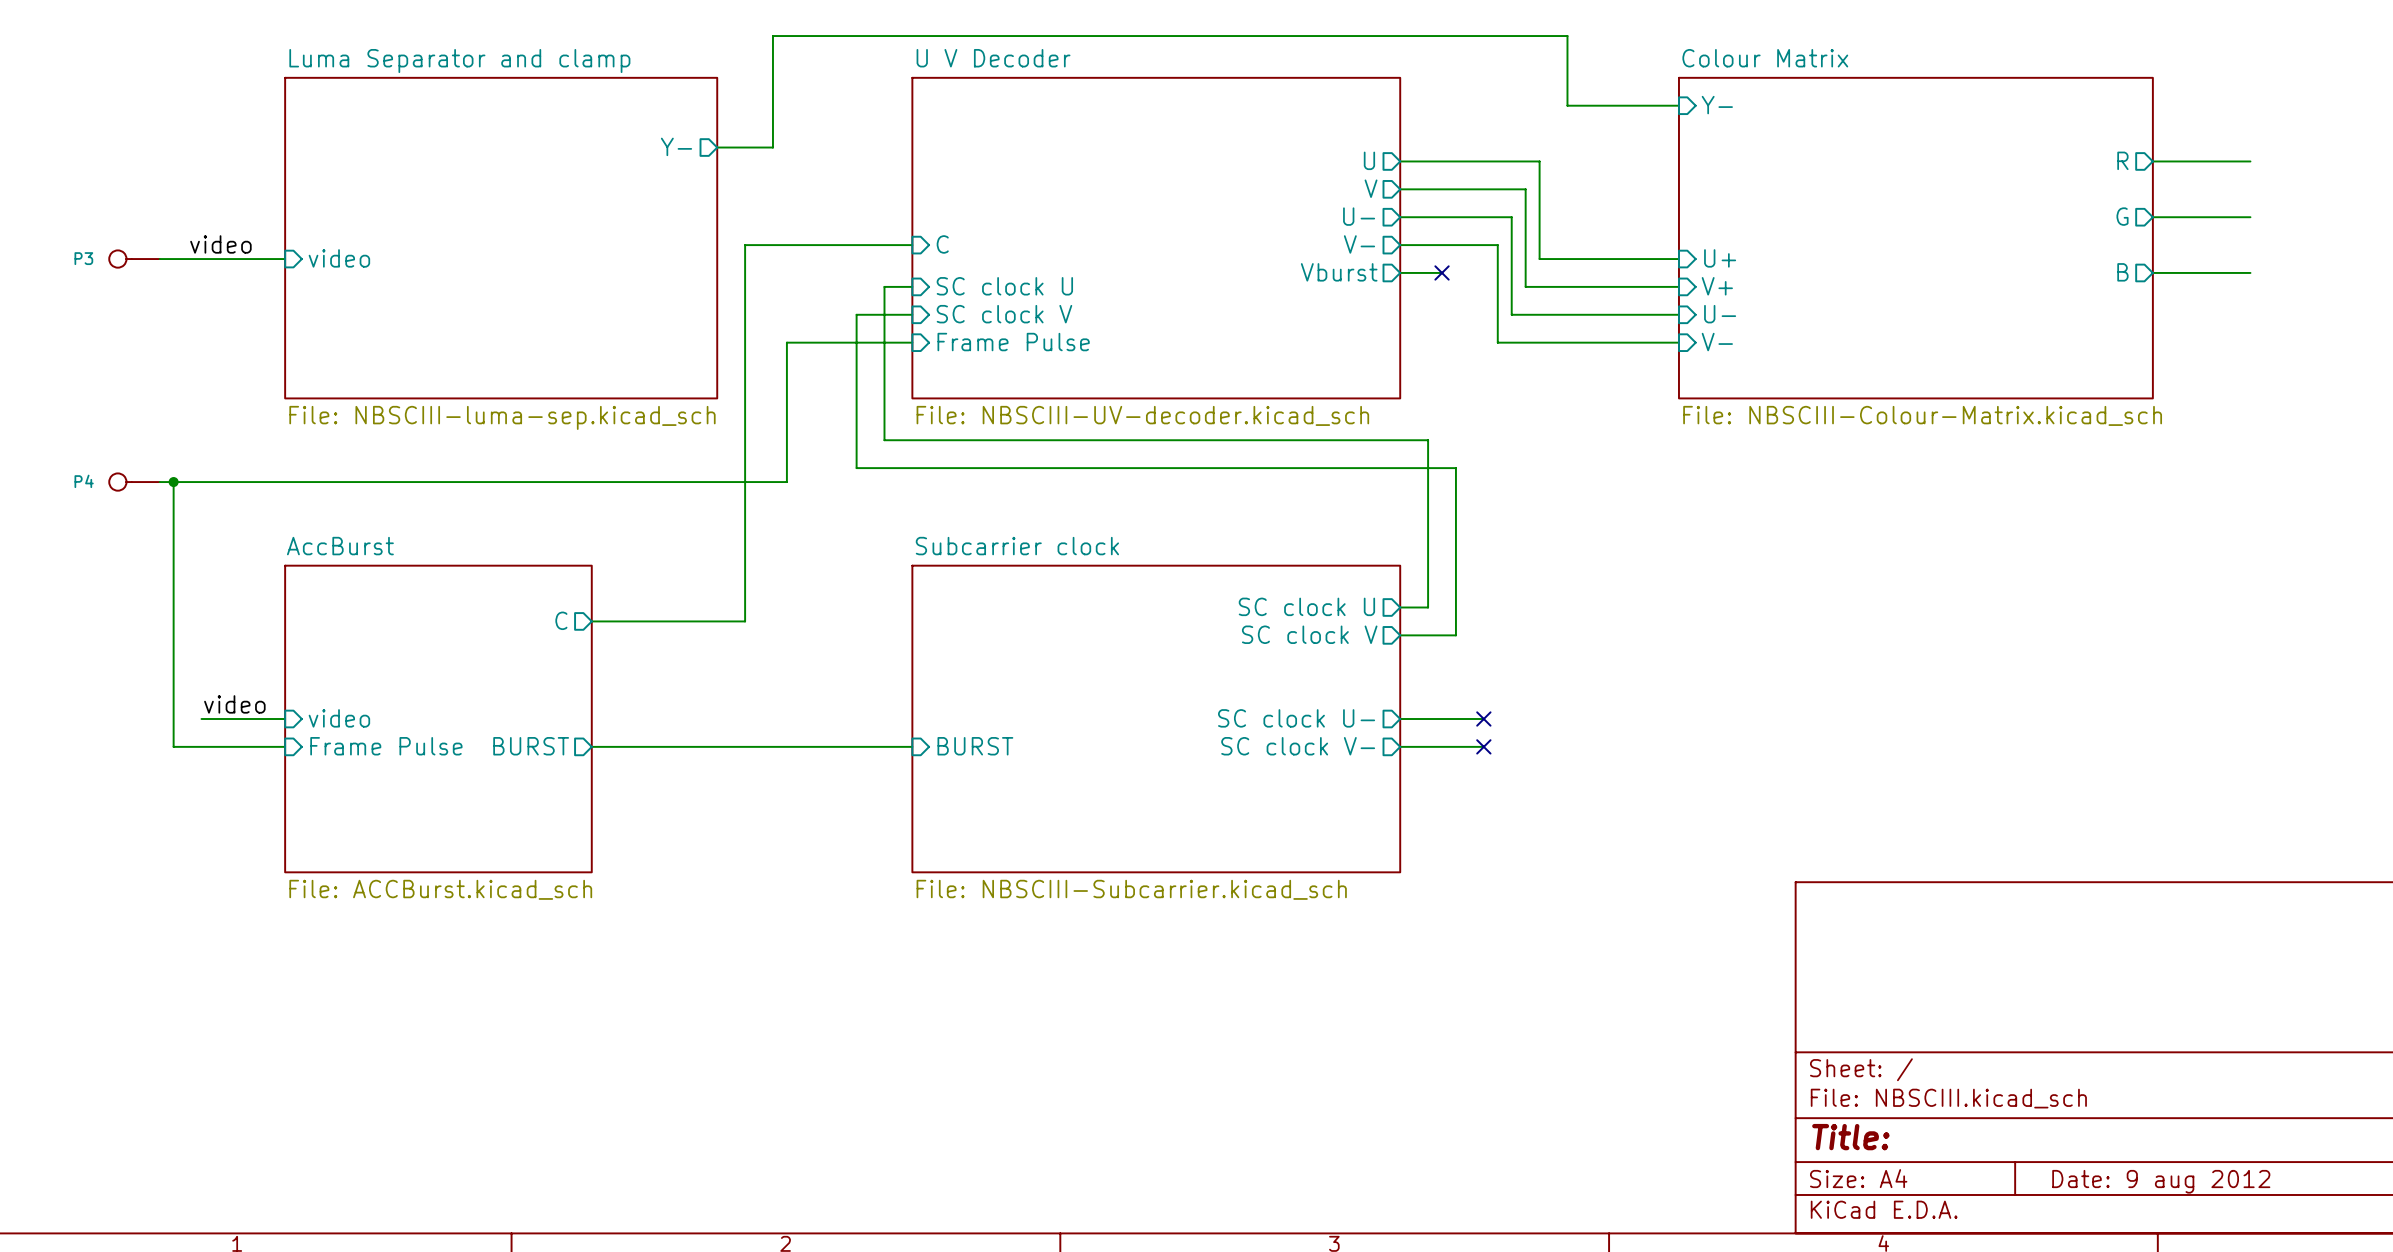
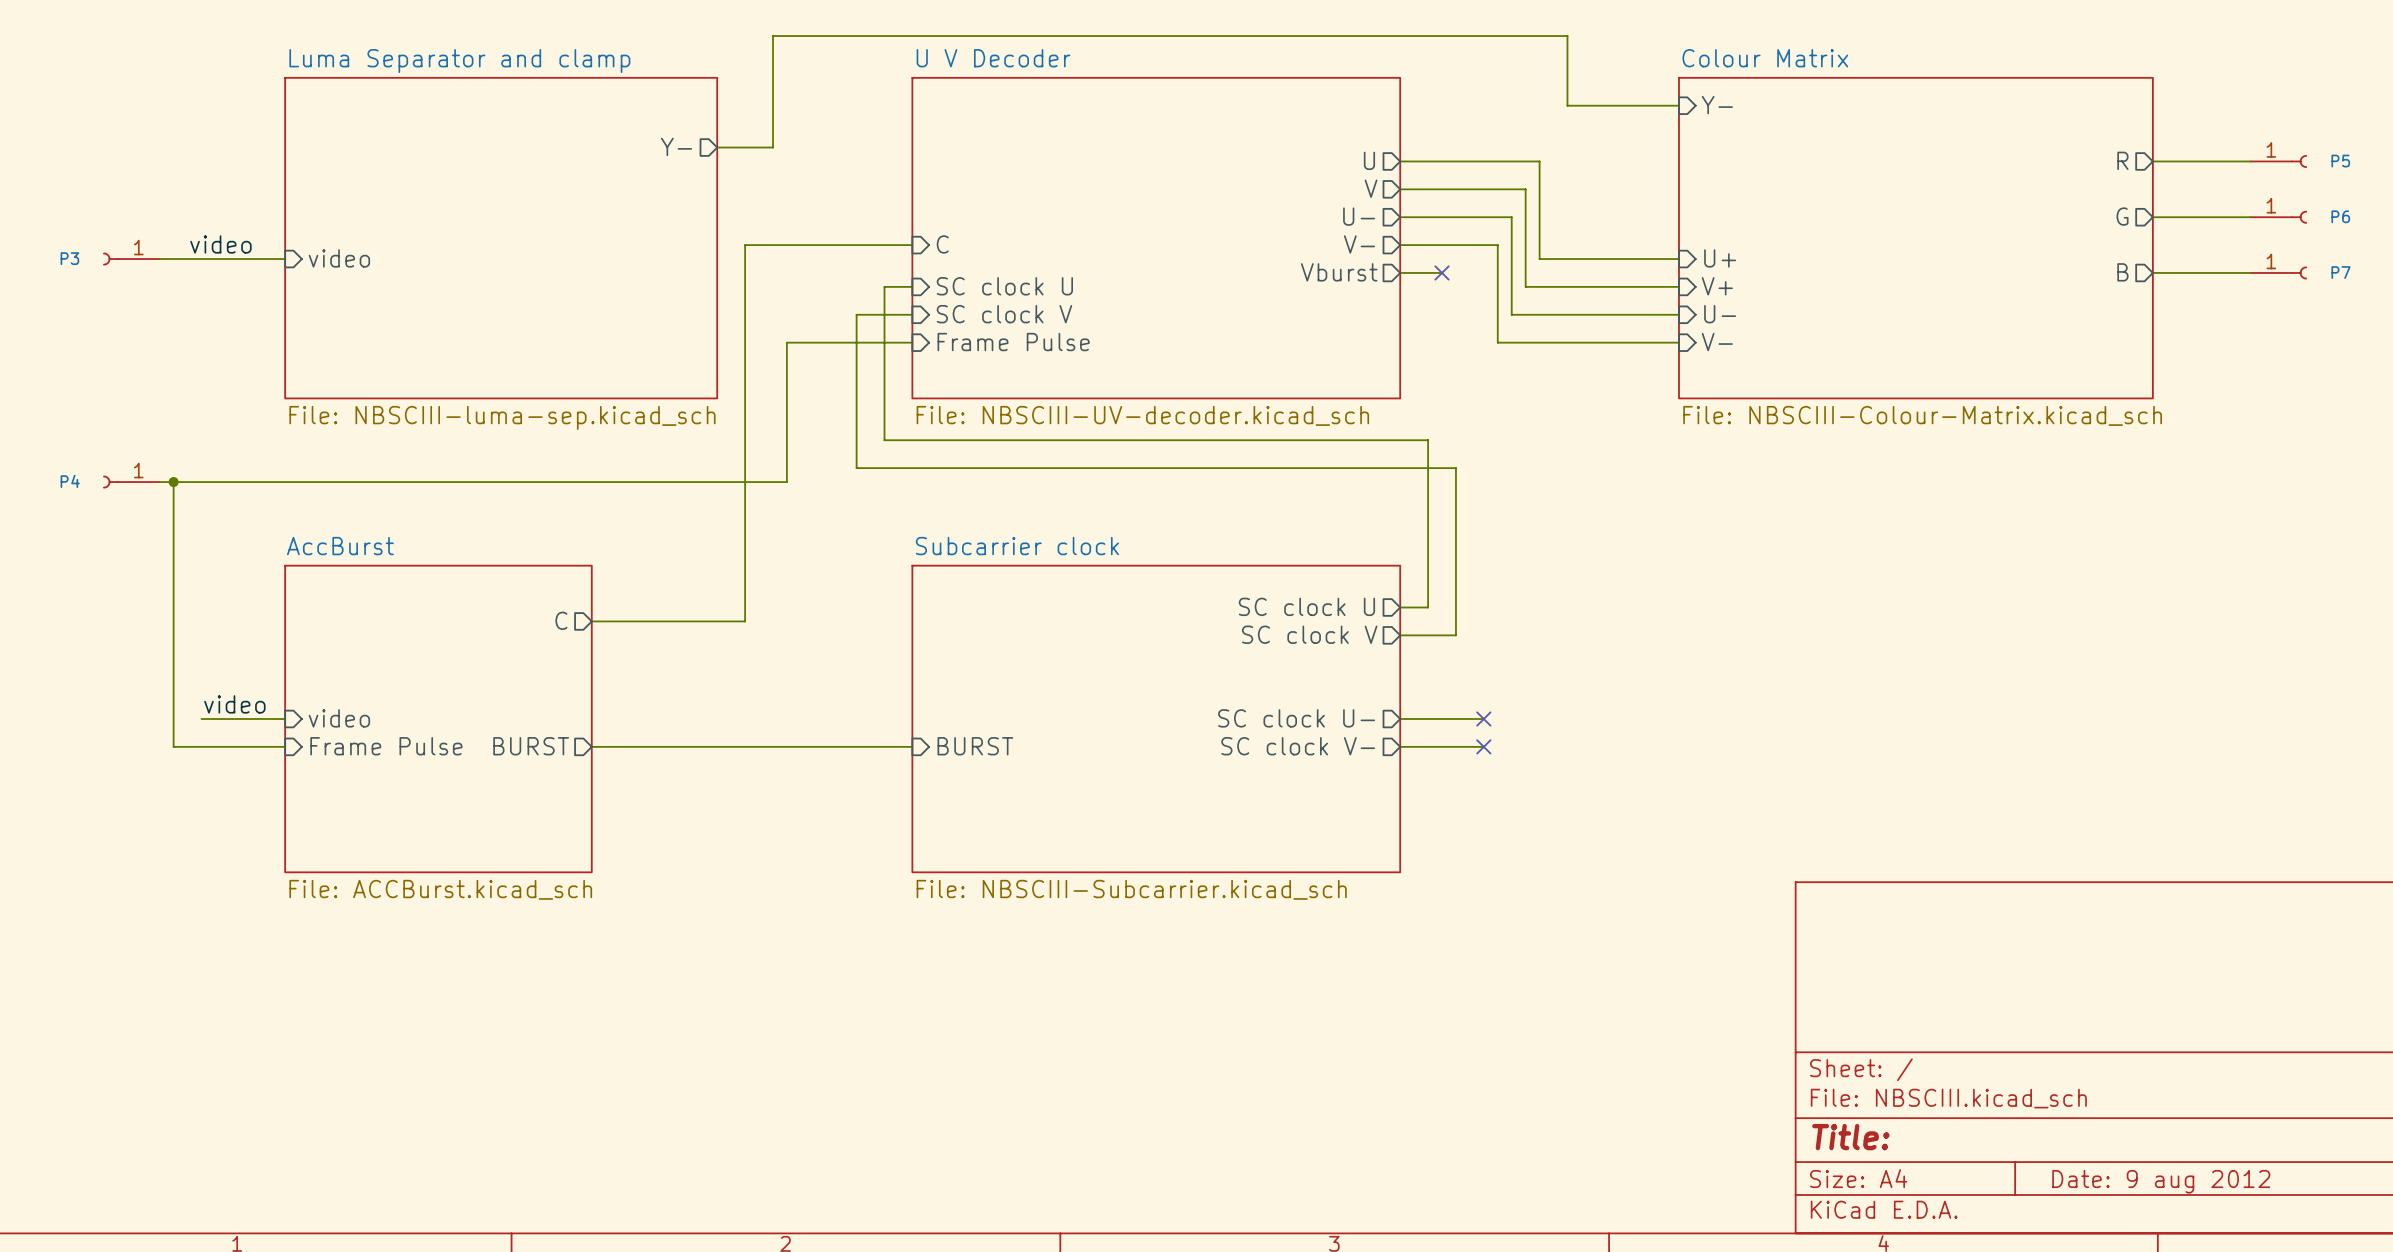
P5: none -> (2278, 161)
P6: none -> (2278, 217)
P3 symbol: [109, 250, 160, 268] -> [103, 252, 160, 266]
P7: none -> (2278, 272)
P4 symbol: [109, 473, 160, 491] -> [103, 475, 160, 489]

